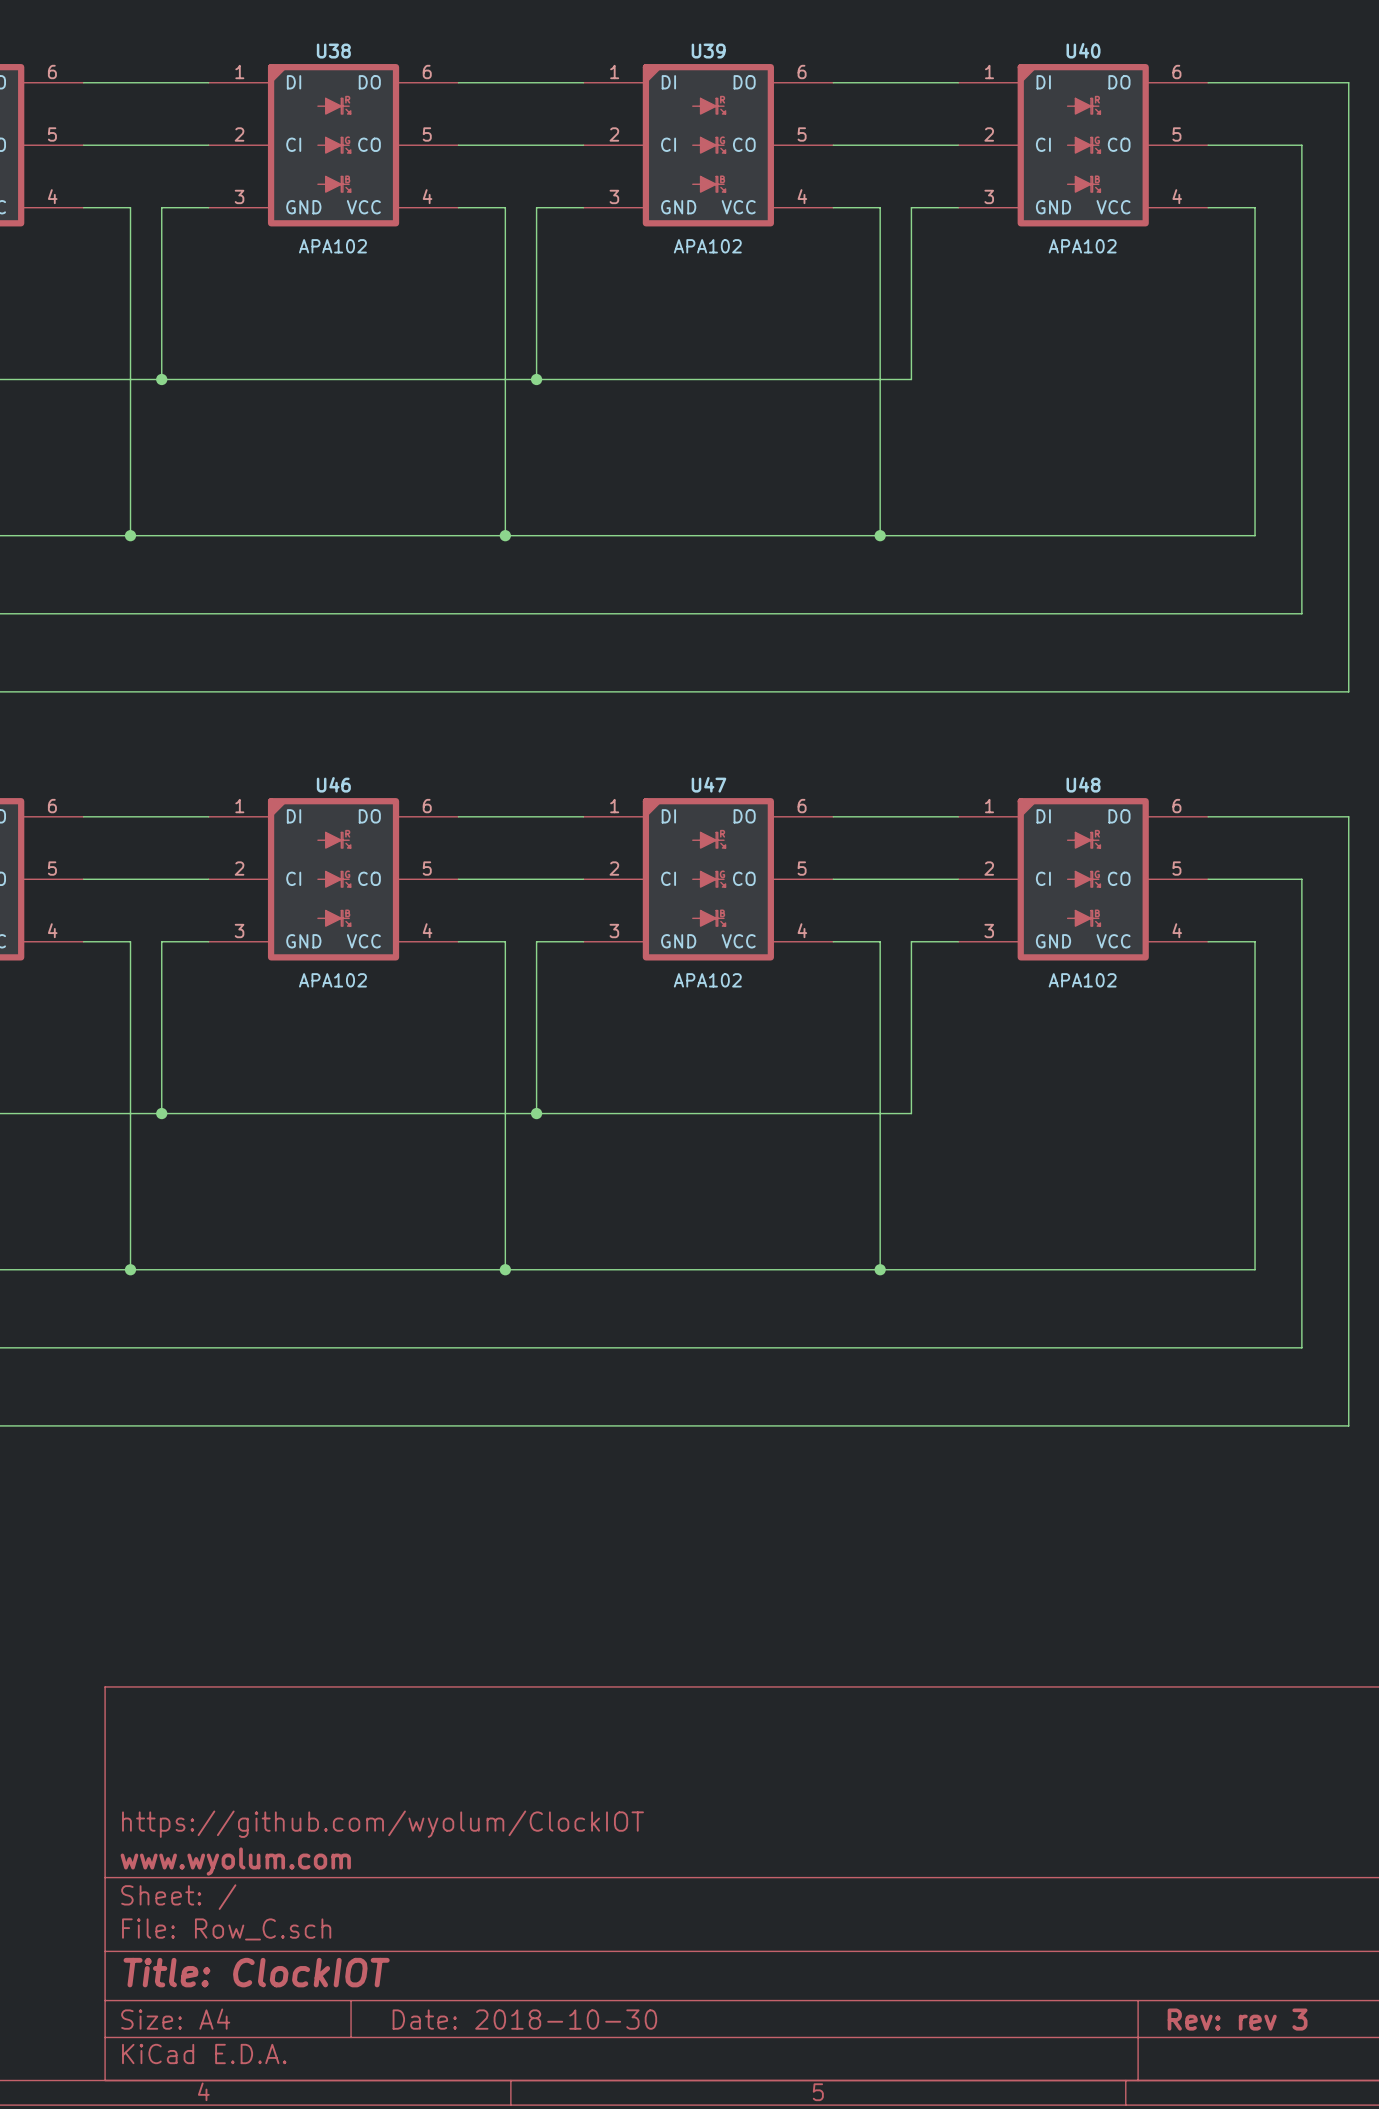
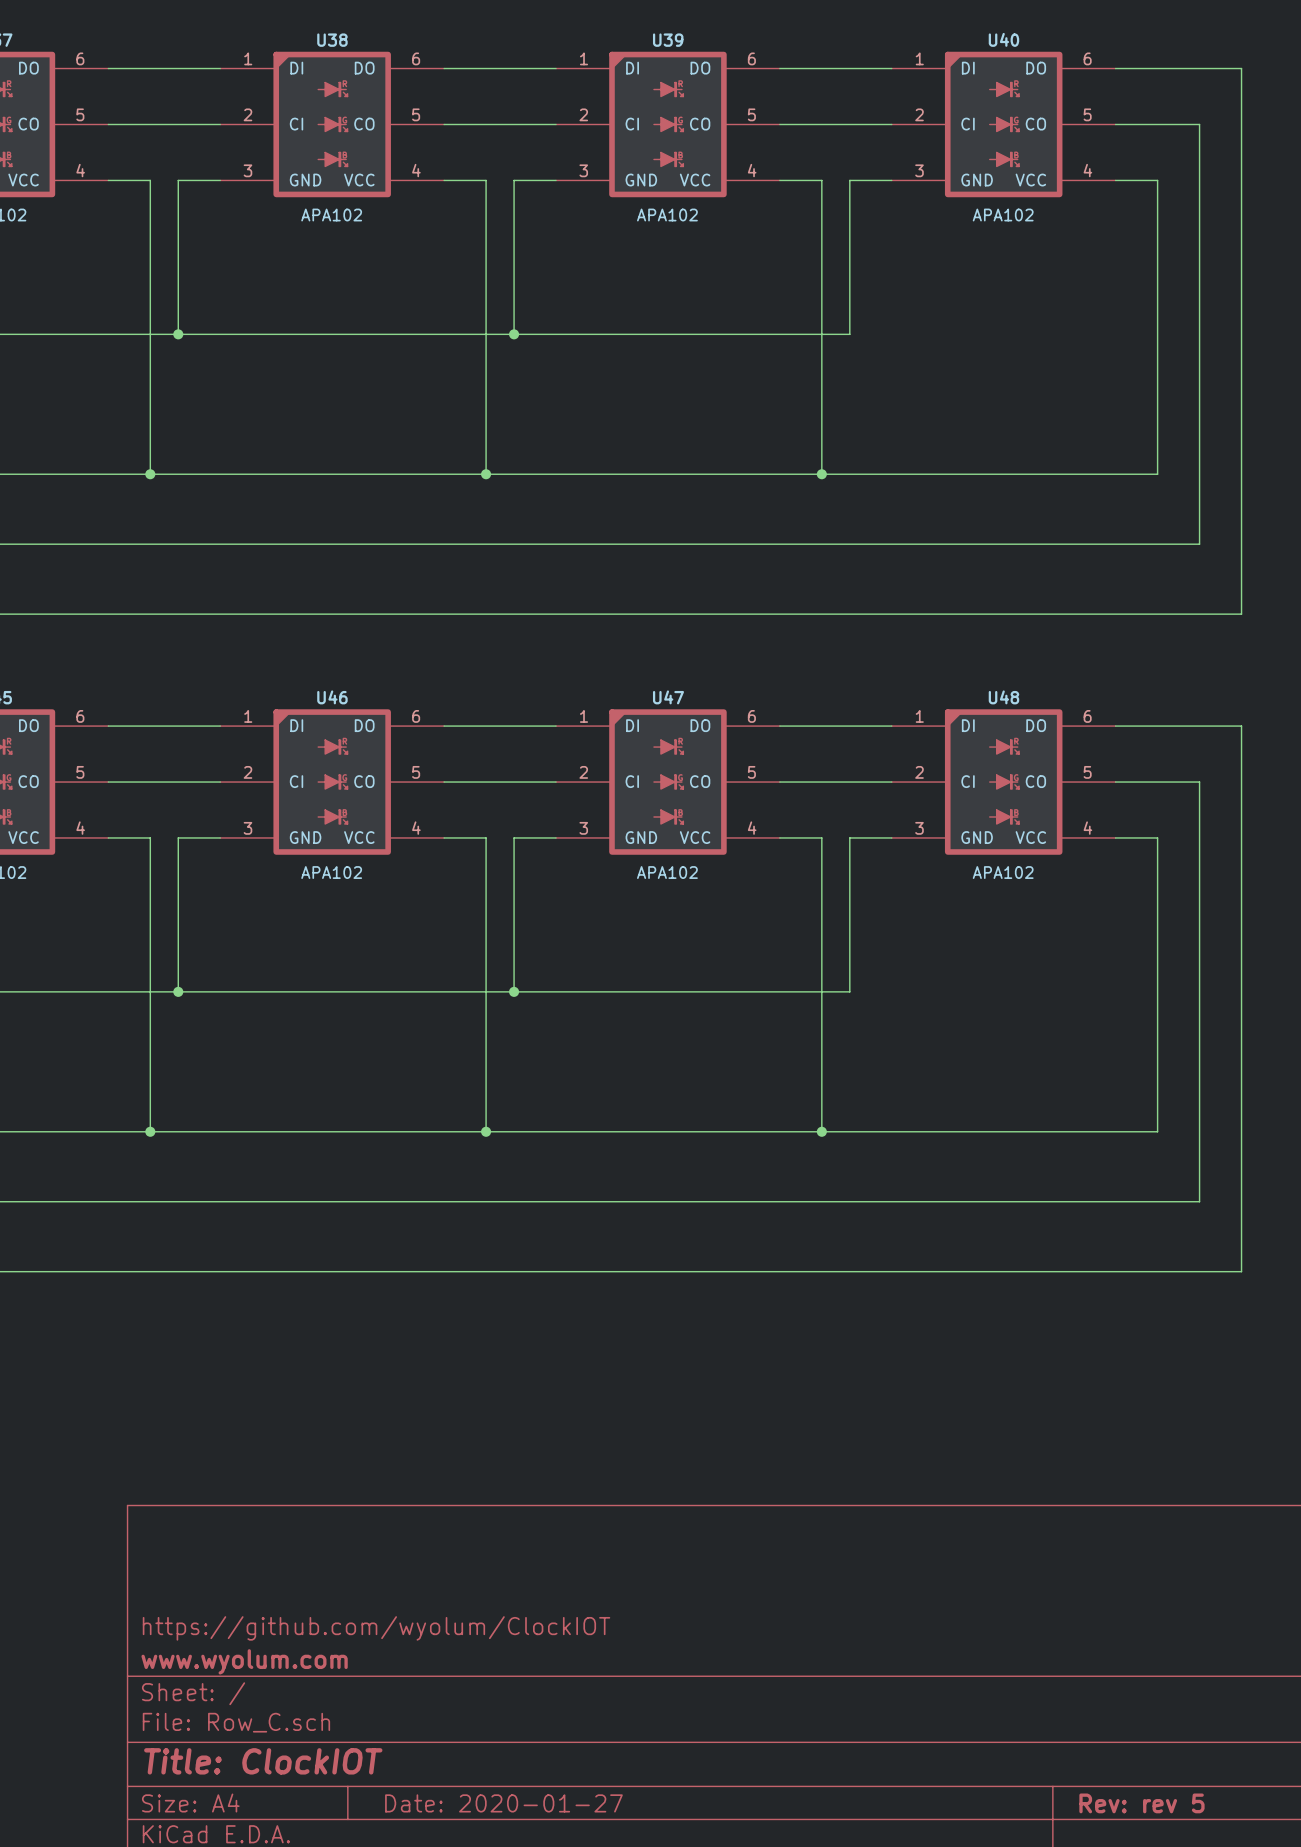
title block: Date: 2018-10-30 (524, 2019) -> Date: 2020-01-27 (503, 1803)
title block: Rev: rev 3 (1237, 2019) -> Rev: rev 5 (1141, 1803)

